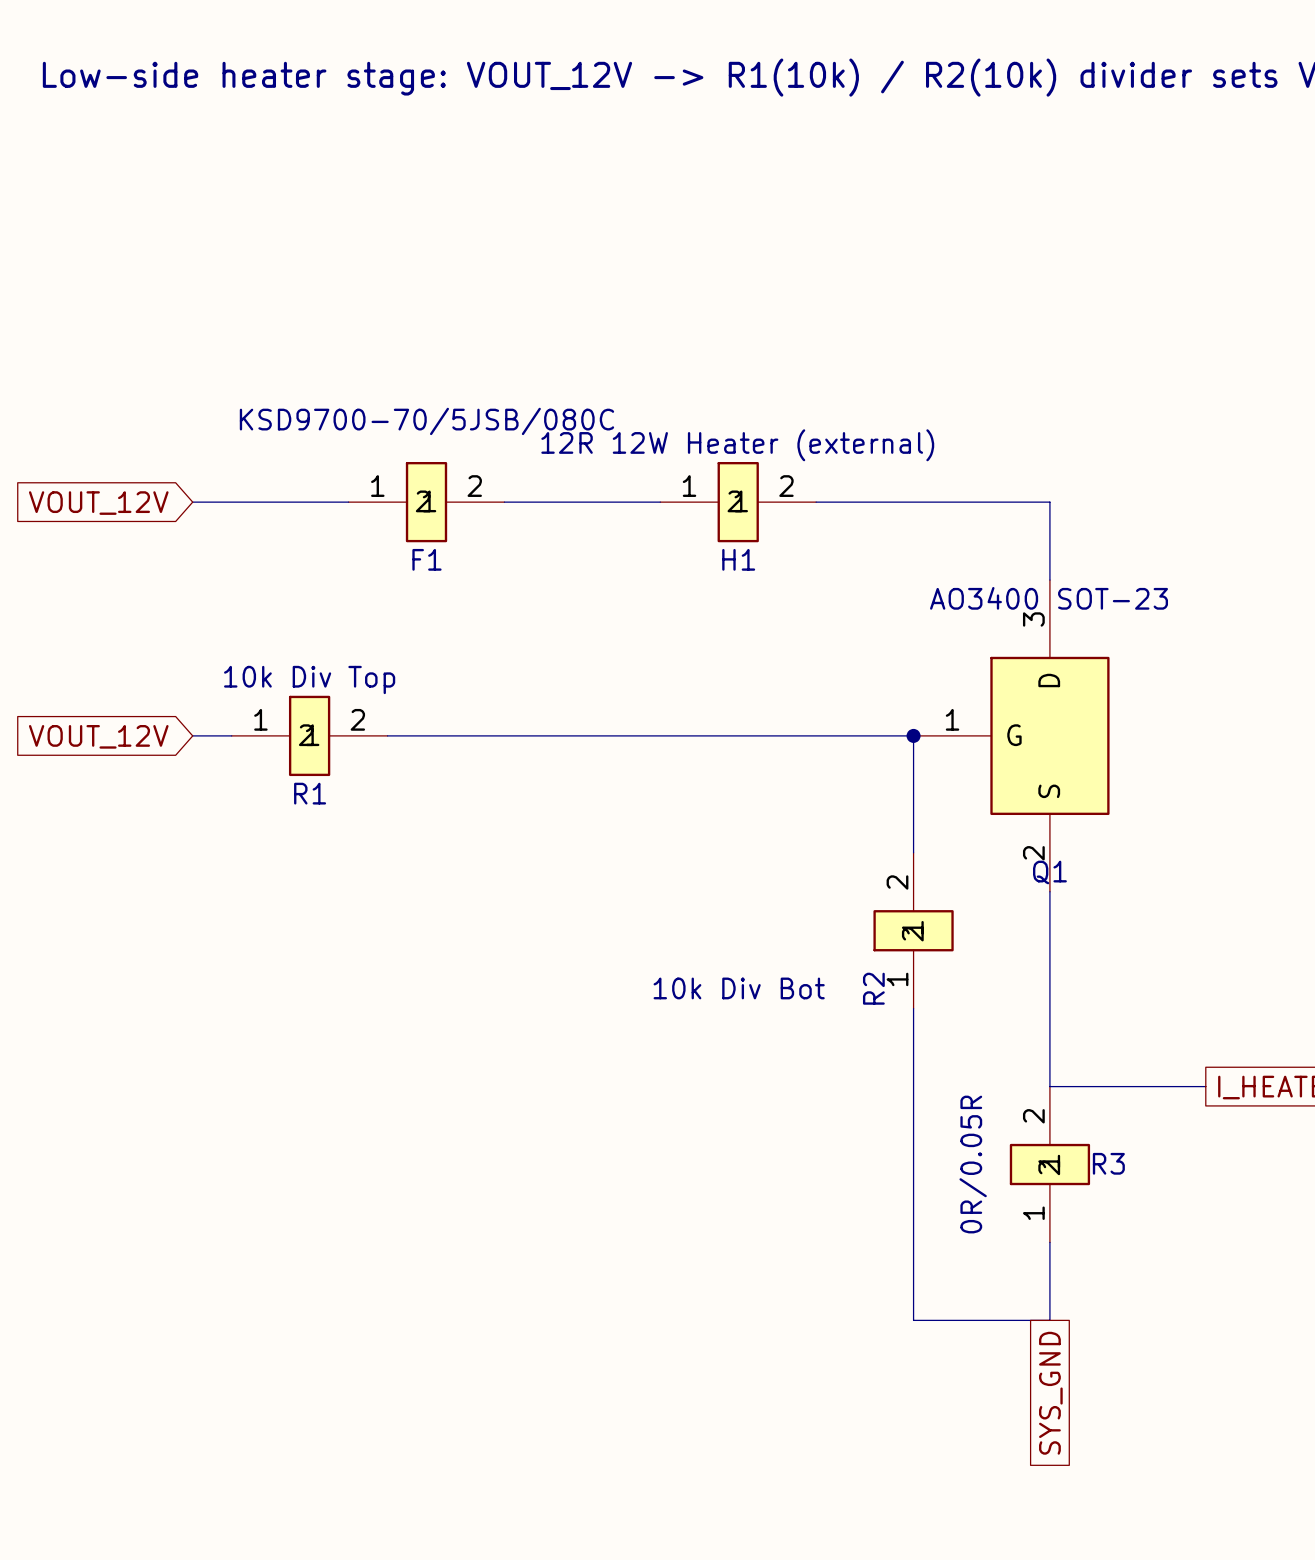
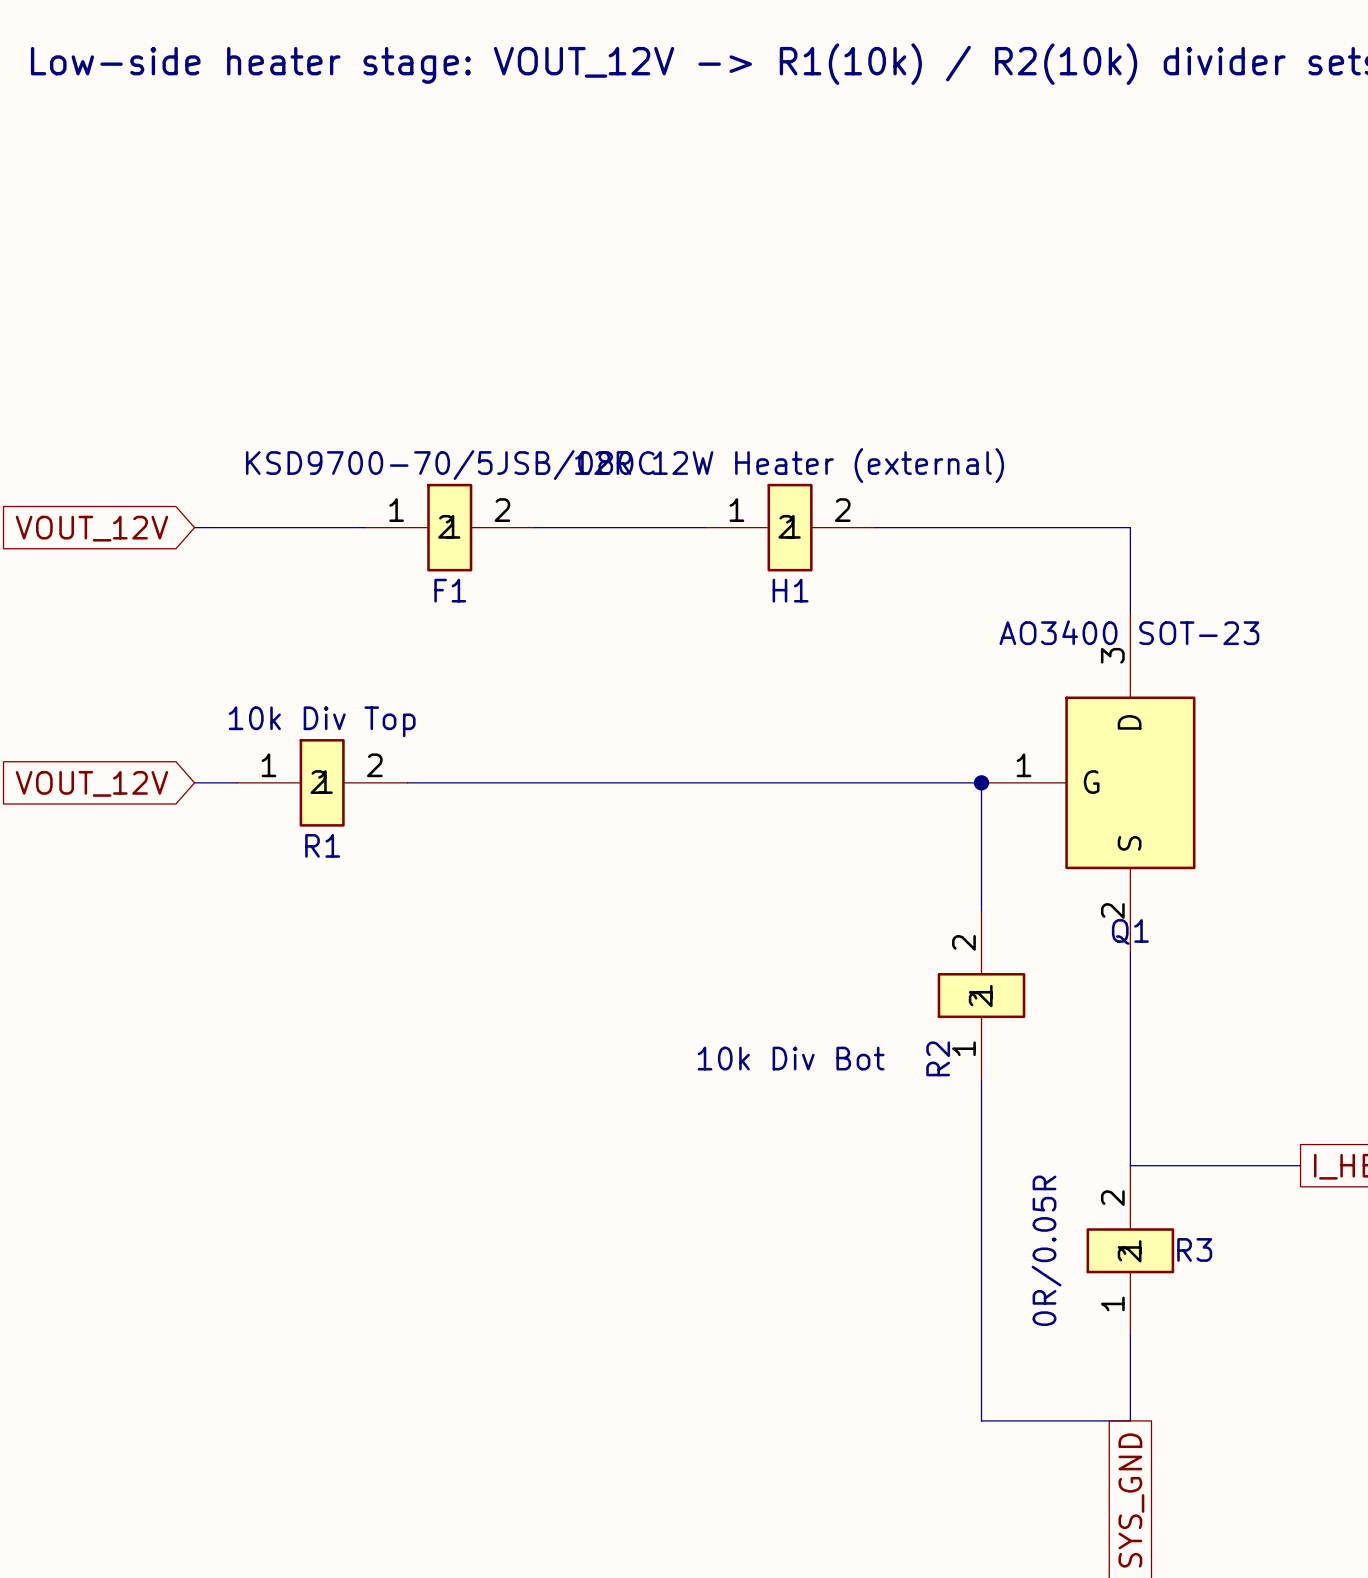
F1 value position: KSD9700-70/5JSB/080C (426, 421) -> KSD9700-70/5JSB/080C (450, 465)

